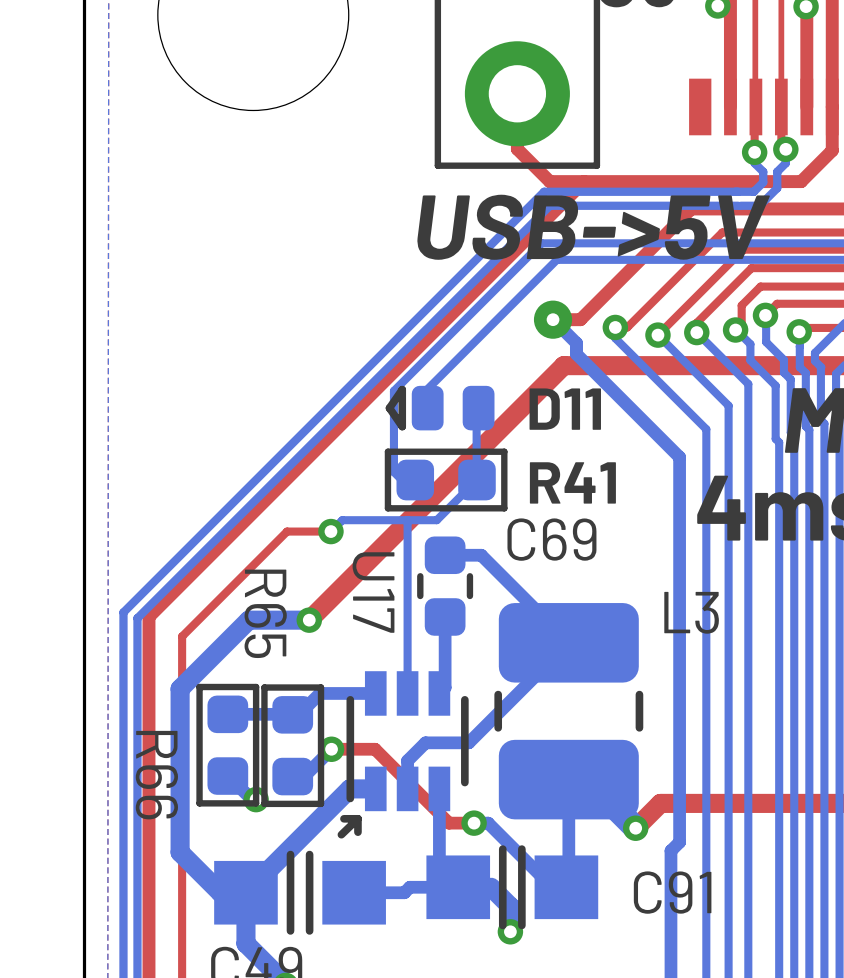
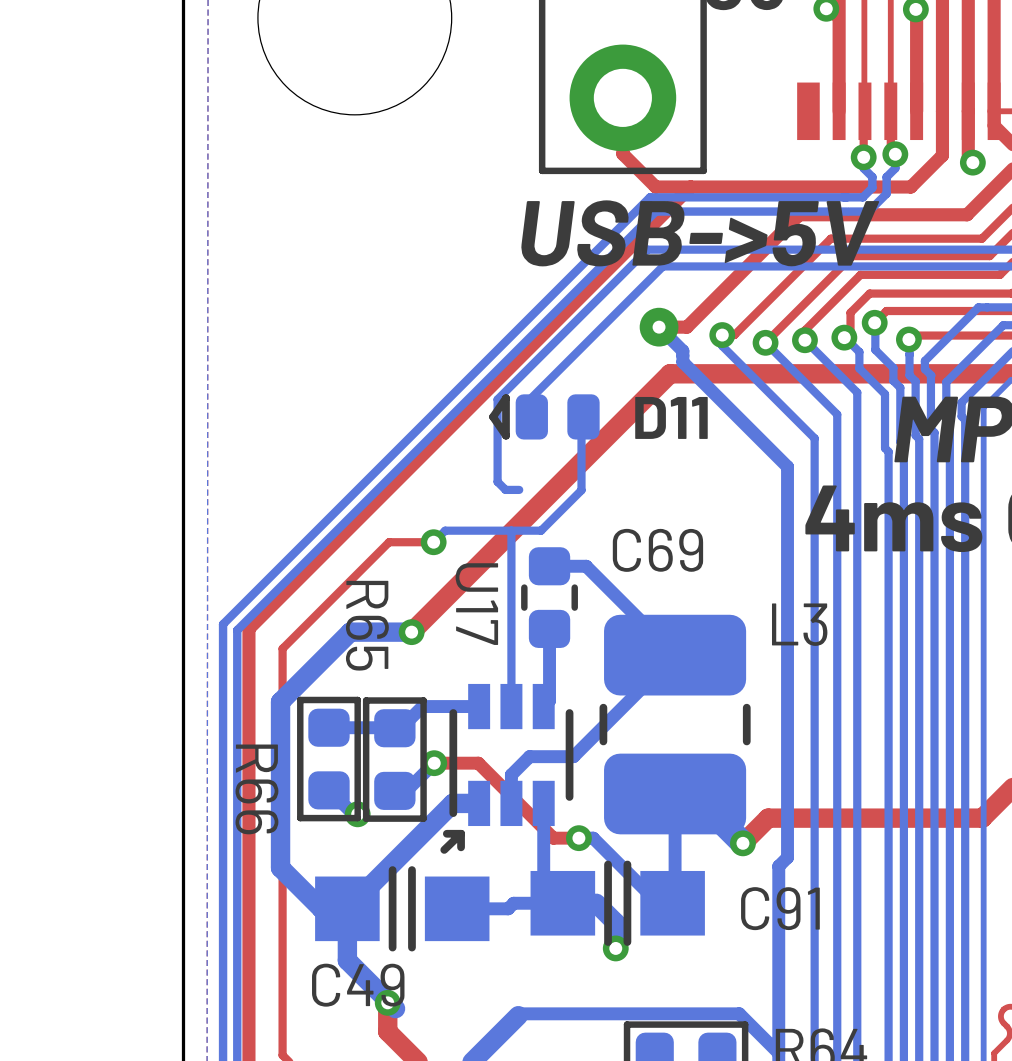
R41: (446, 480) -> none

